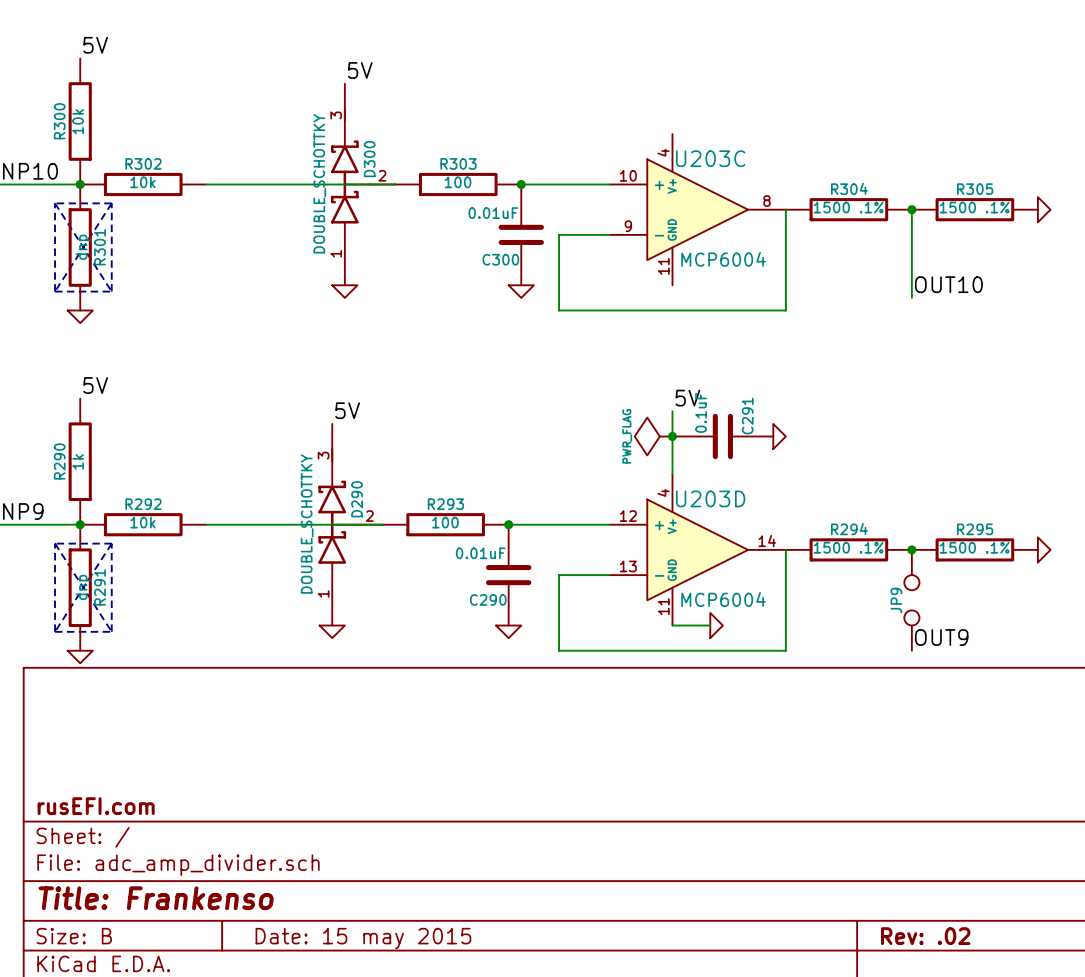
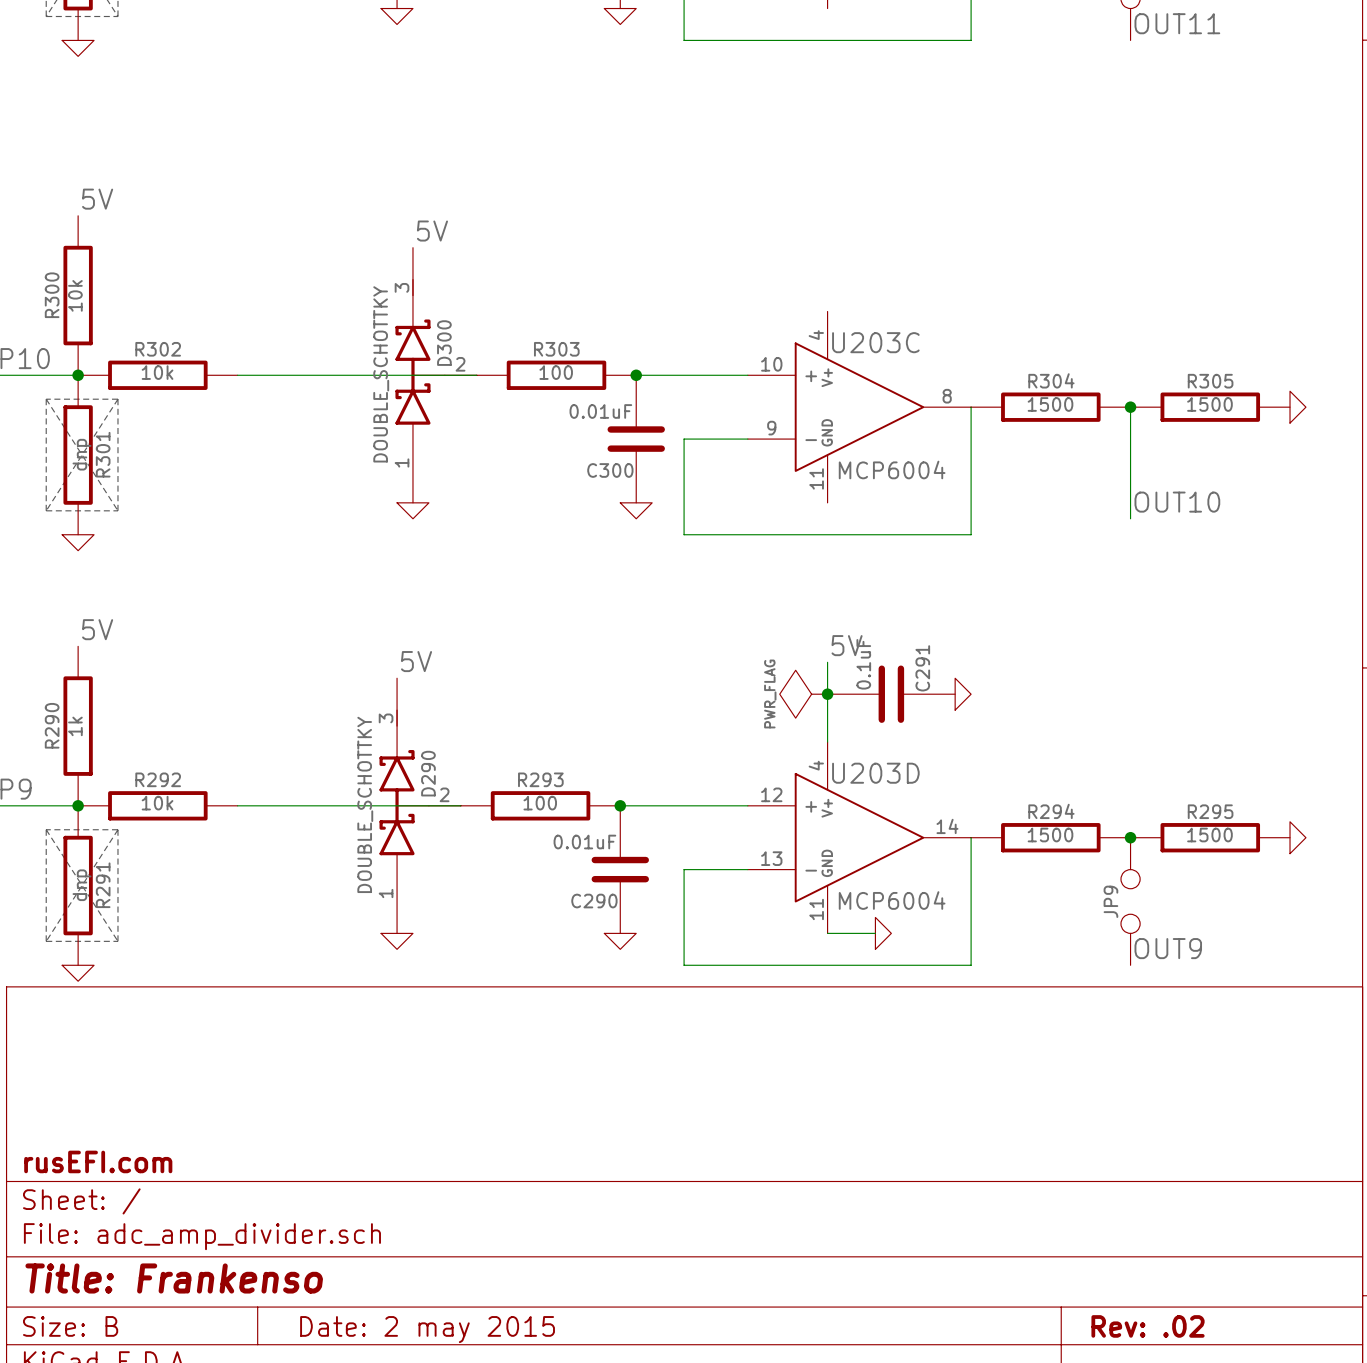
R304 value: 1500 .1% (848, 207) -> 1500 (1050, 404)
R305 value: 1500 .1% (974, 207) -> 1500 (1209, 404)
R294 value: 1500 .1% (848, 547) -> 1500 (1050, 835)
R295 value: 1500 .1% (974, 547) -> 1500 (1209, 835)
title block: Date: 15 may 2015 (363, 938) -> Date: 2 may 2015 (427, 1329)

